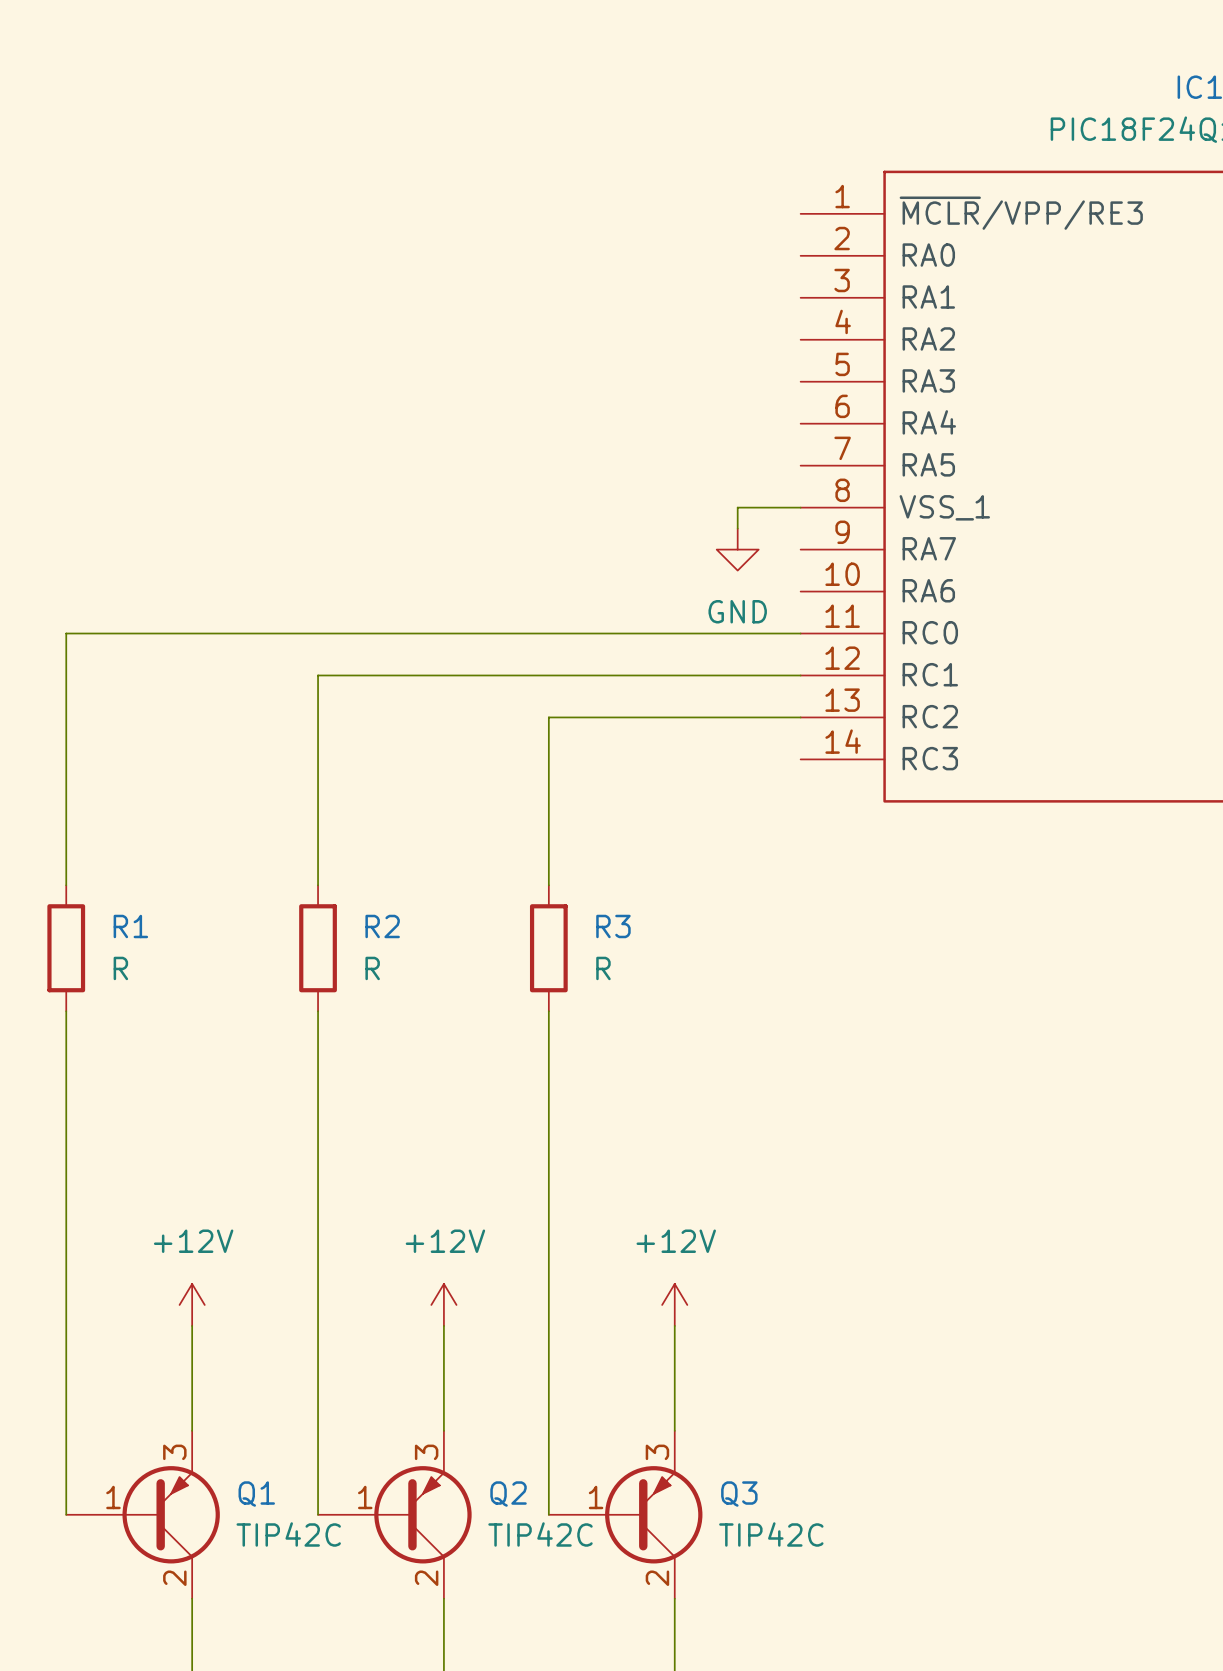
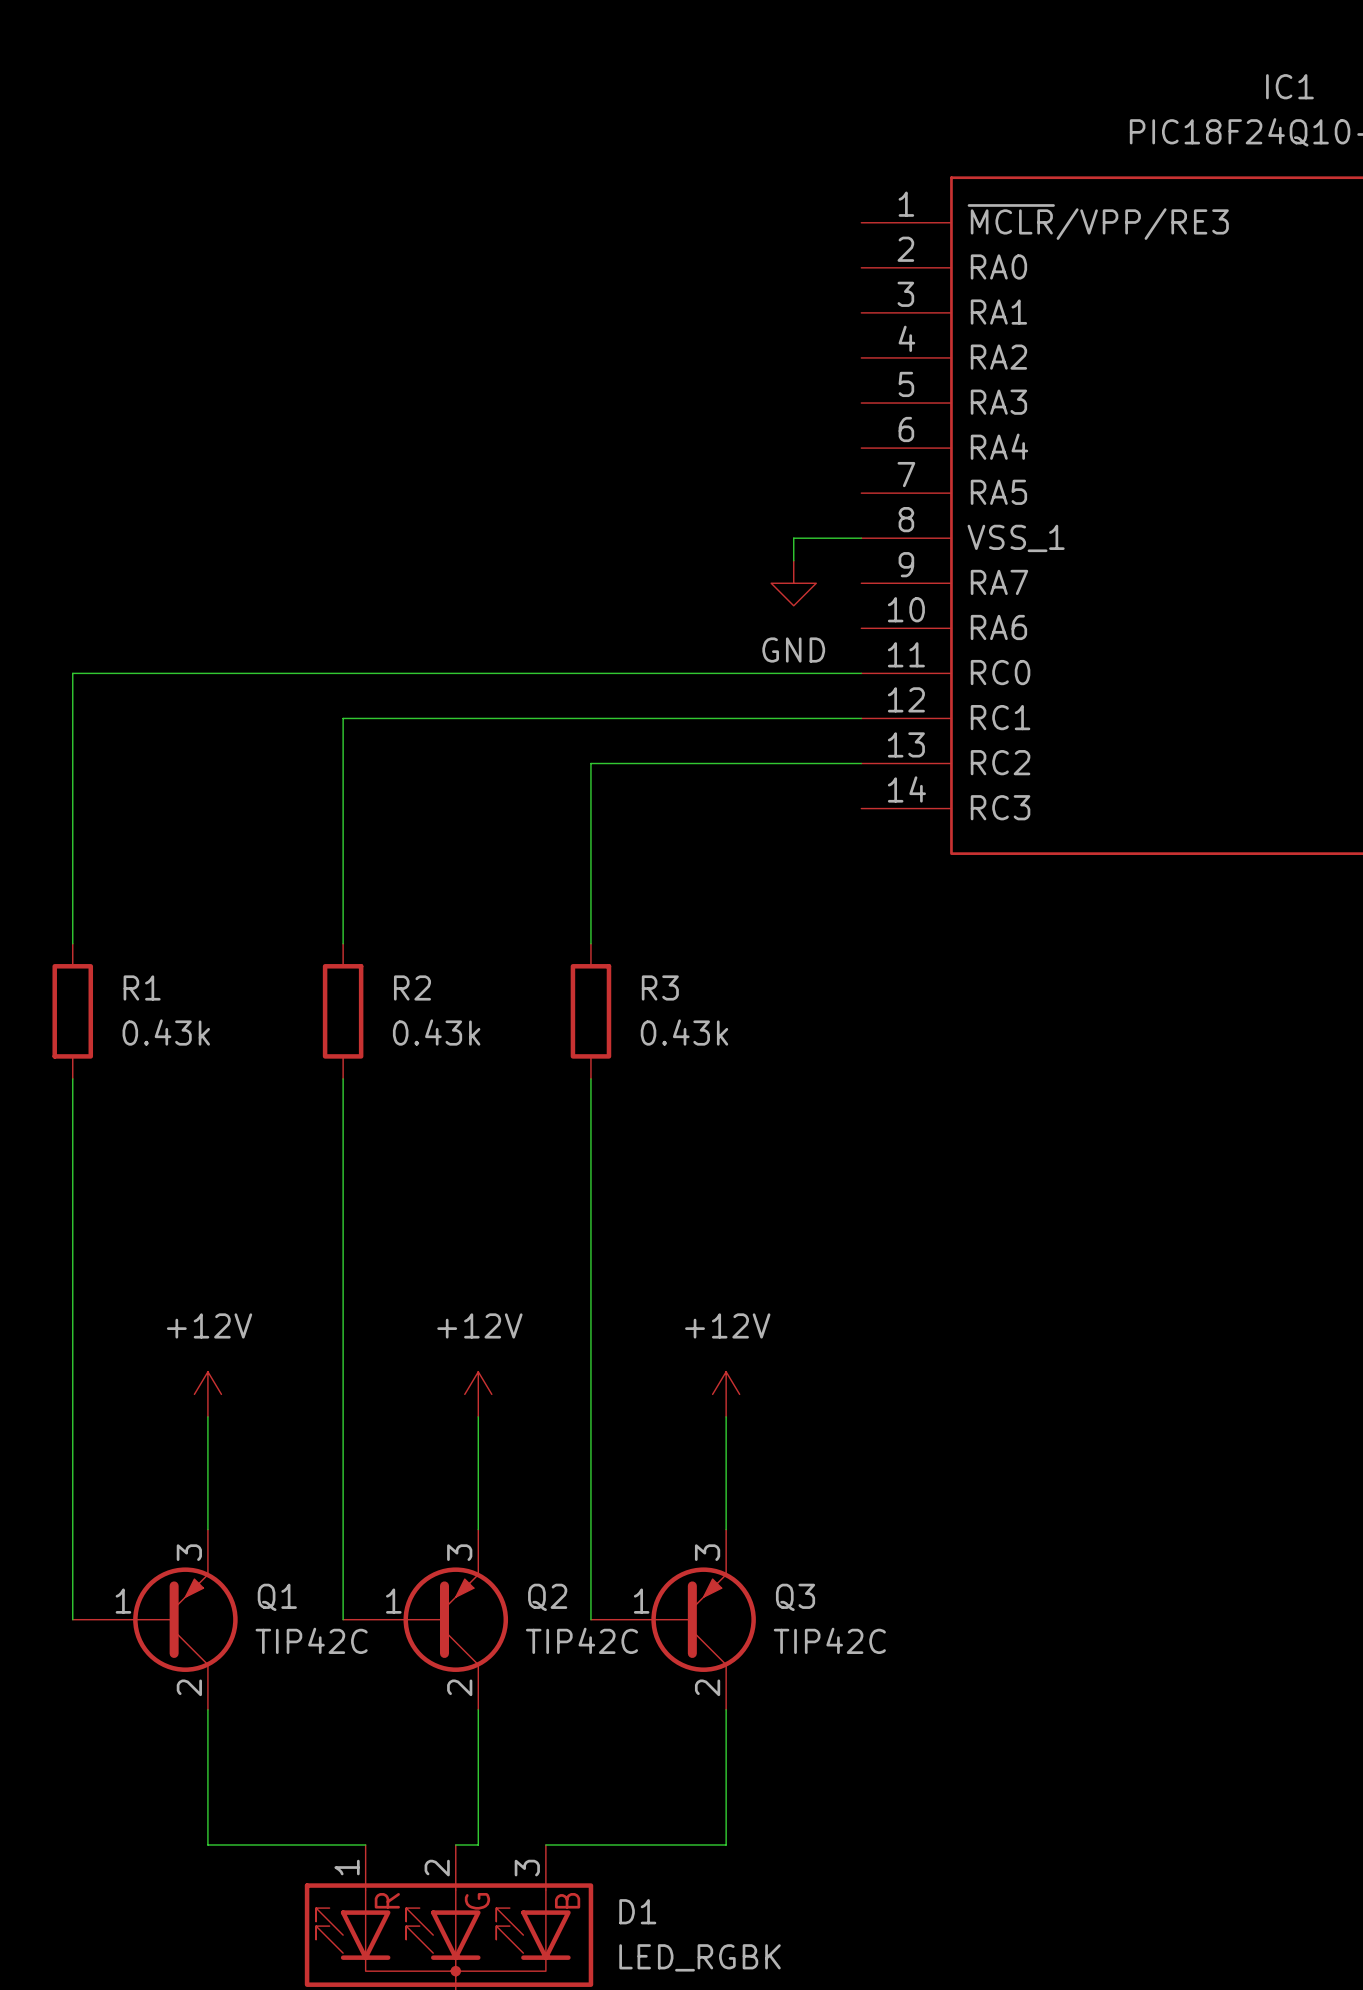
R1 value: R (120, 968) -> 0.43k (166, 1032)
R2 value: R (372, 968) -> 0.43k (436, 1032)
R3 value: R (603, 968) -> 0.43k (684, 1032)

